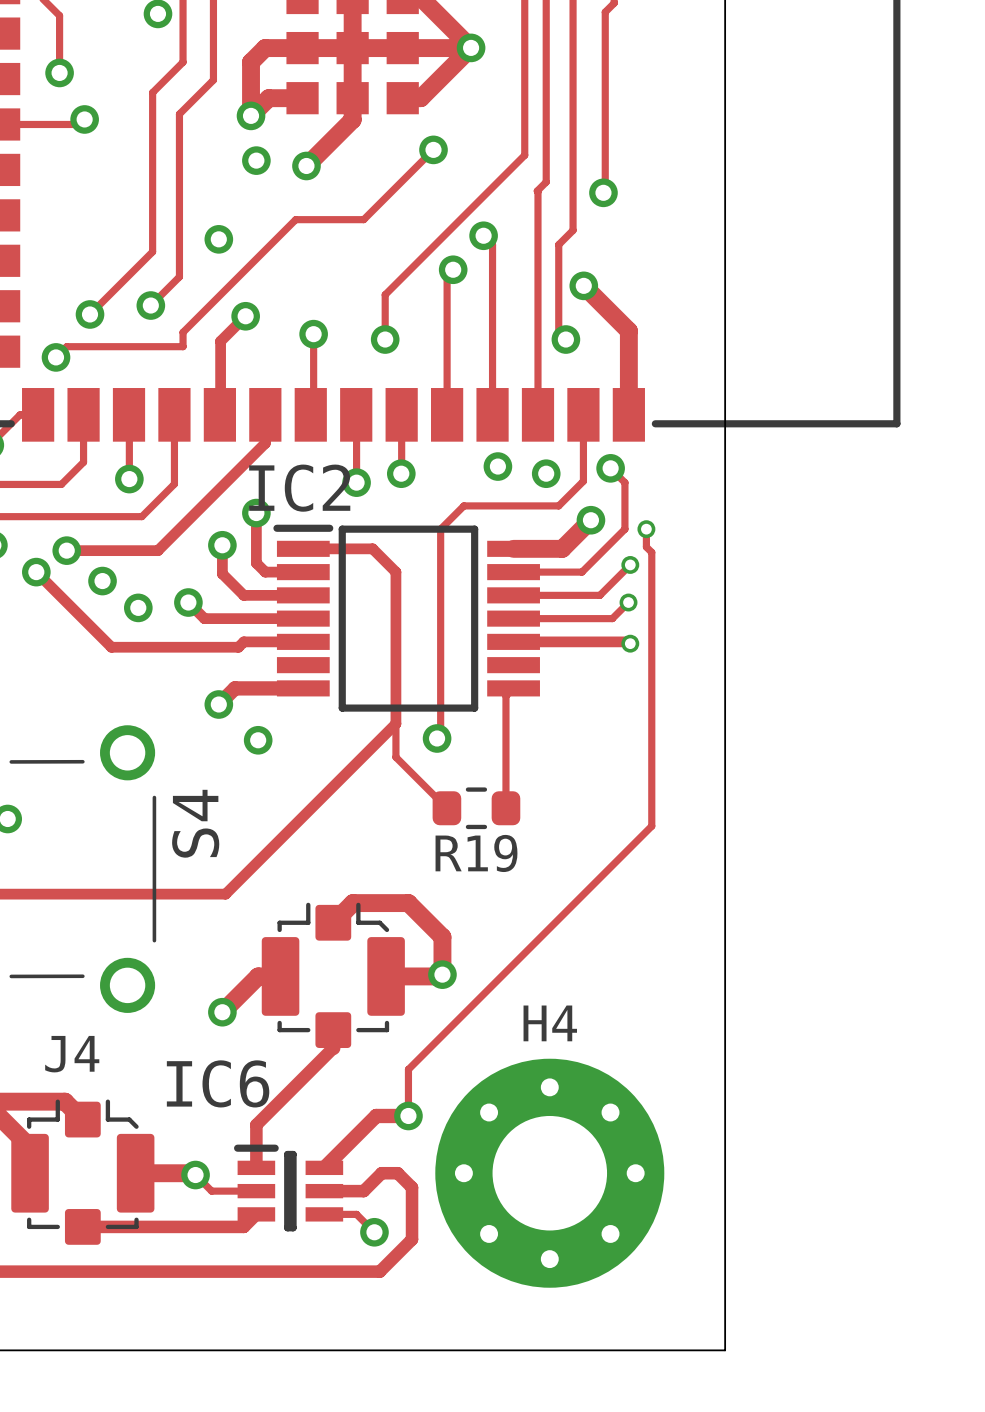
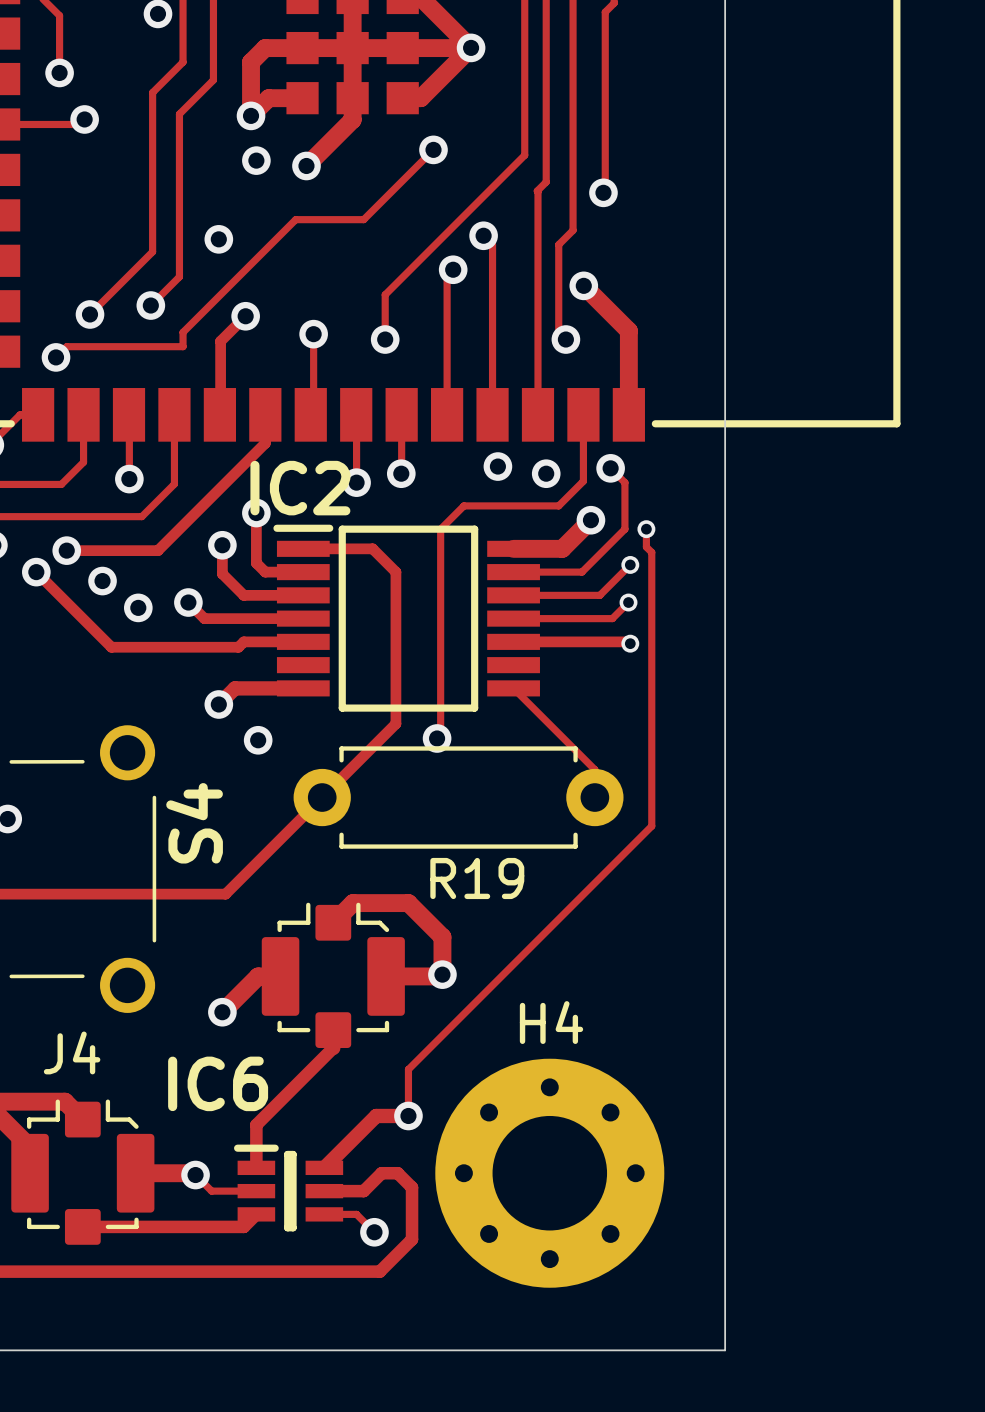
track: (513, 688) (505, 696) (505, 808) -> (513, 688) (594, 769) (594, 797)
track: (395, 723) (395, 757) (446, 808) -> none
R19 footprint: [432, 787, 521, 830] -> [293, 746, 624, 849]

